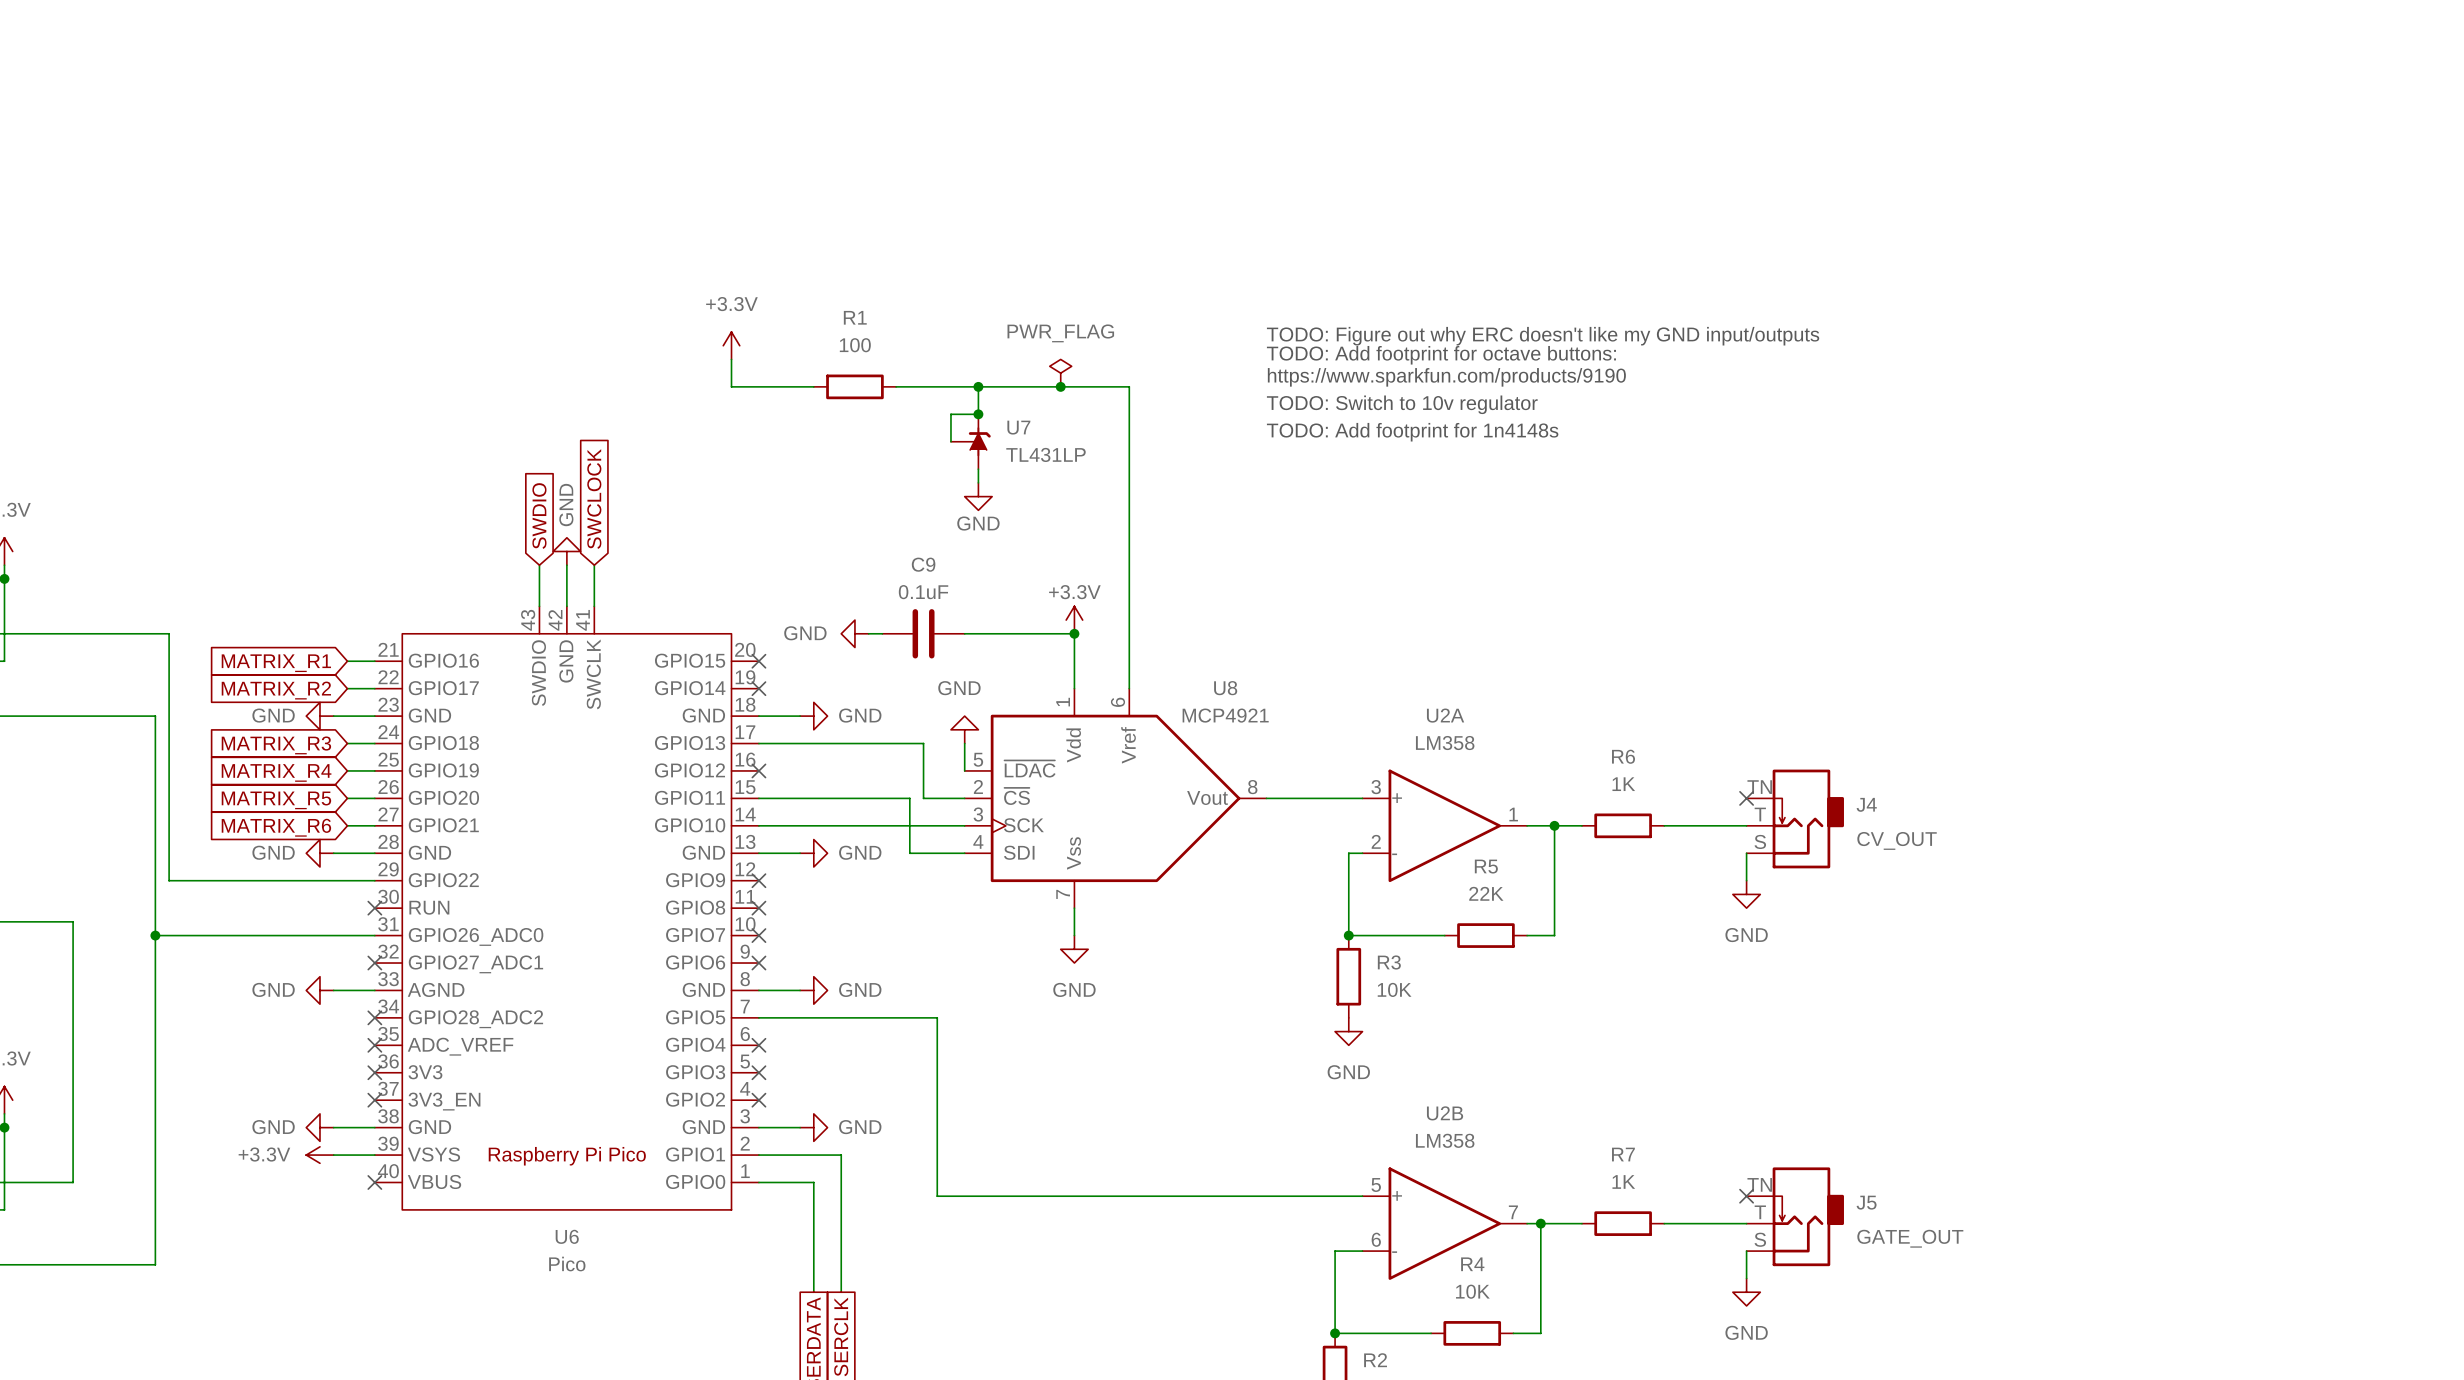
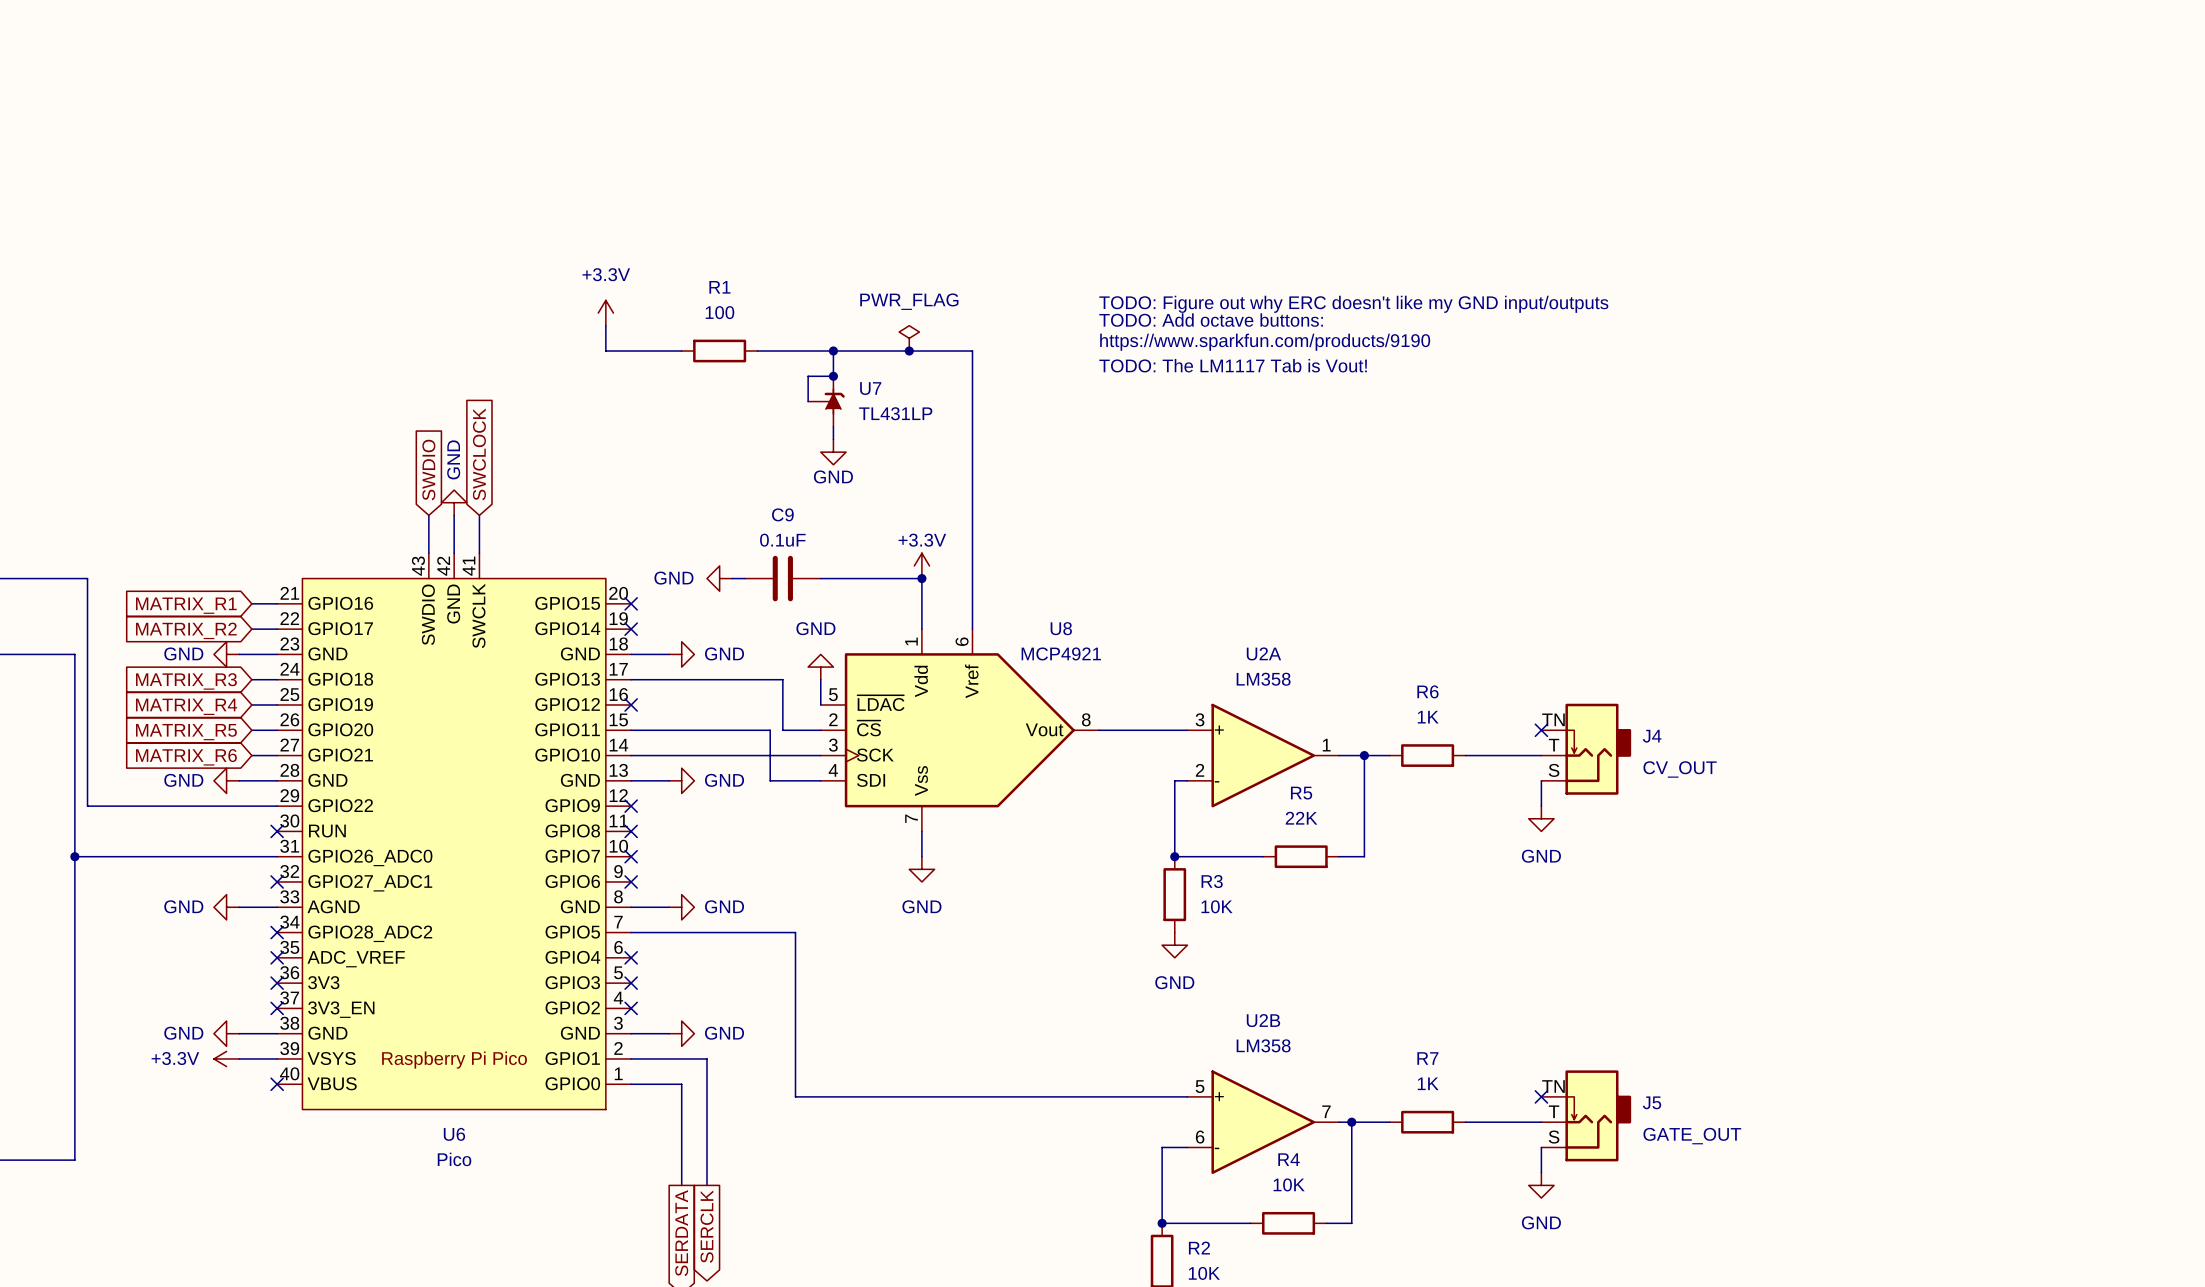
text: TODO: Add footprint for octave buttons: (1441, 355) -> TODO: Add octave buttons: (1211, 320)
text: TODO: Switch to 10v regulator (1402, 404) -> TODO: The LM1117 Tab is Vout! (1233, 365)
text: TODO: Add footprint for 1n4148s (1412, 432) -> none

